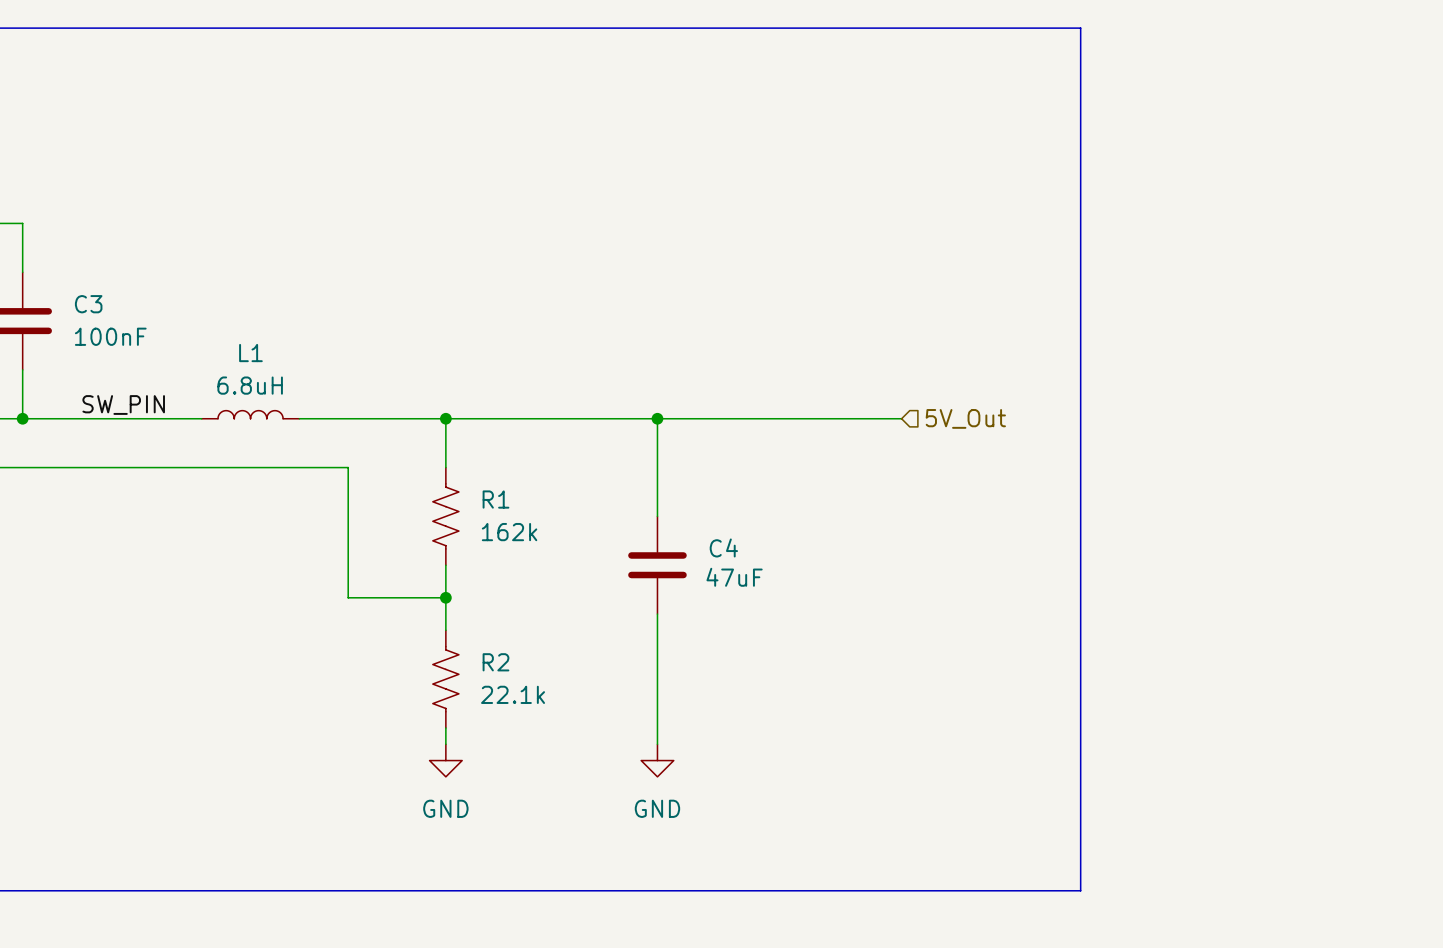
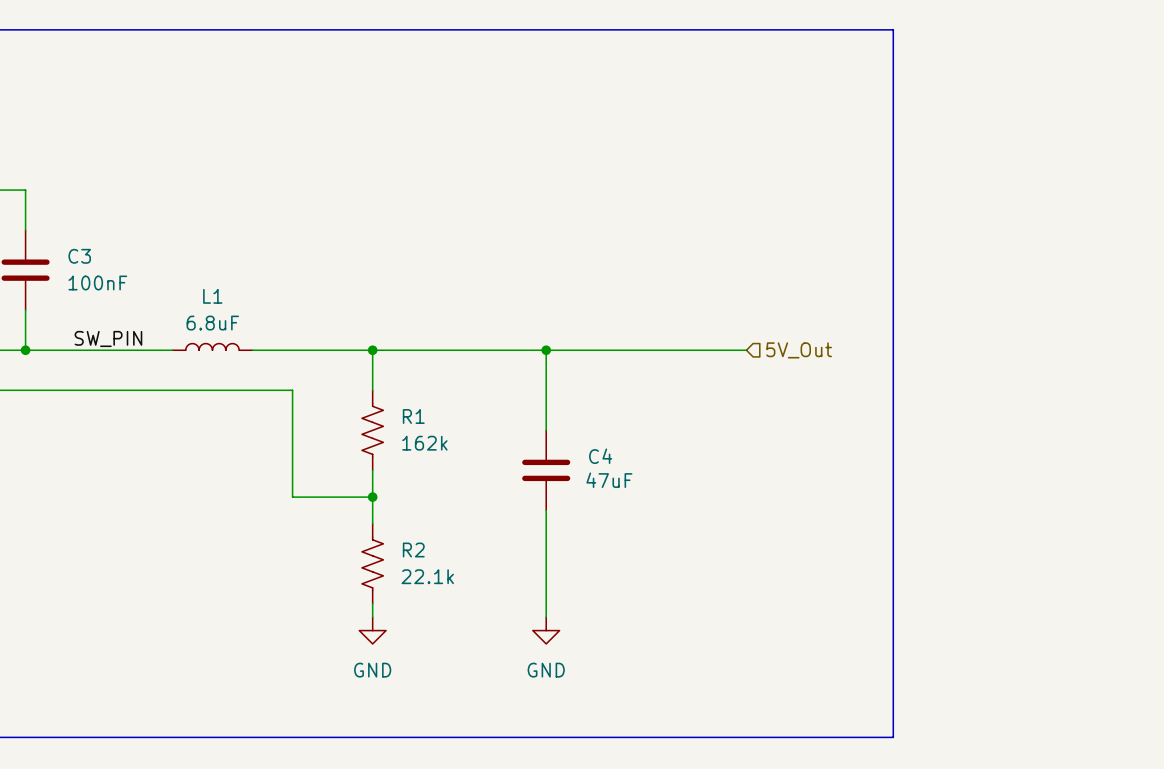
L1 value: 6.8uH (250, 385) -> 6.8uF (212, 323)

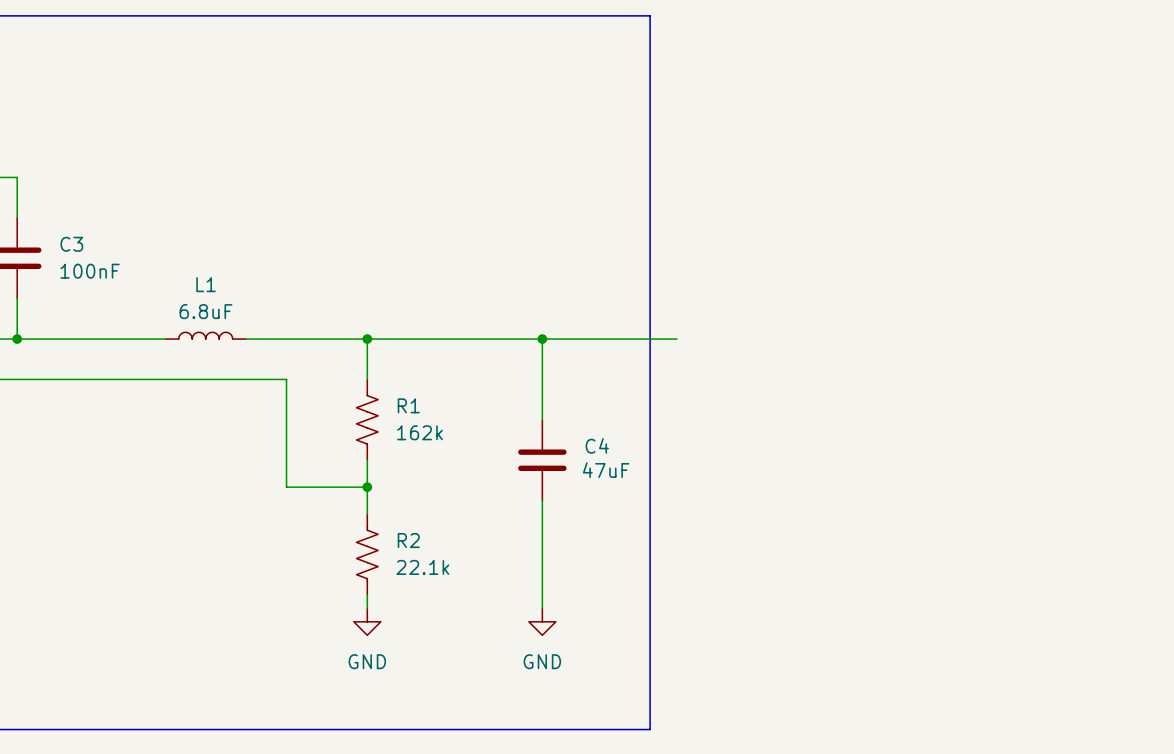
line: (653, 29) (893, 29) (893, 737) (653, 737) -> (650, 15) (650, 729)
label: SW_PIN (108, 338) -> none
wire: (679, 350) (746, 350) -> none
hierarchical label: 5V_Out (799, 350) -> none

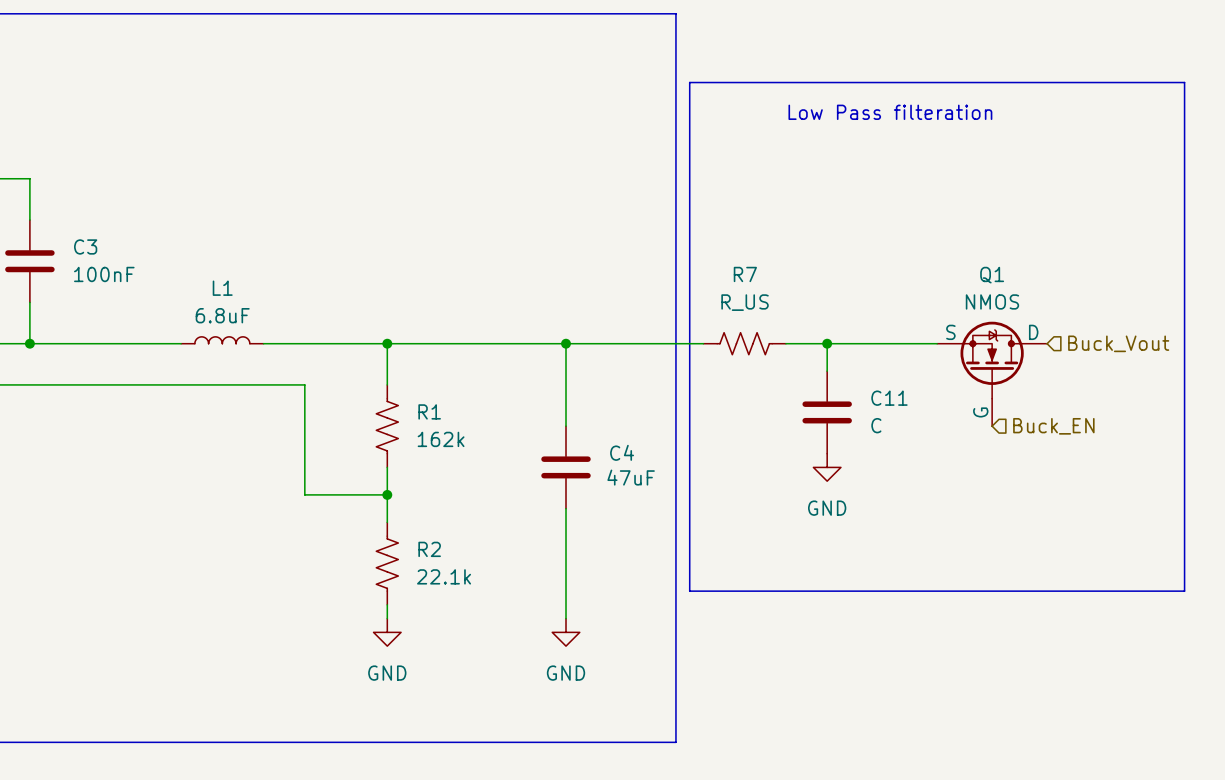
line: none -> (689, 82) (1184, 82) (1184, 591) (689, 591) (689, 82)
text: none -> Low Pass filteration (890, 112)
R7: none -> R_US (744, 343)
wire: none -> (785, 343) (937, 343)
wire: none -> (827, 343) (827, 371)
junction: none -> (827, 343)
hierarchical label: none -> Buck_Vout (1118, 343)
Q1: none -> NMOS (992, 373)
C11: none -> C (827, 412)
hierarchical label: none -> Buck_EN (1053, 426)
power symbol: none -> GND (827, 467)

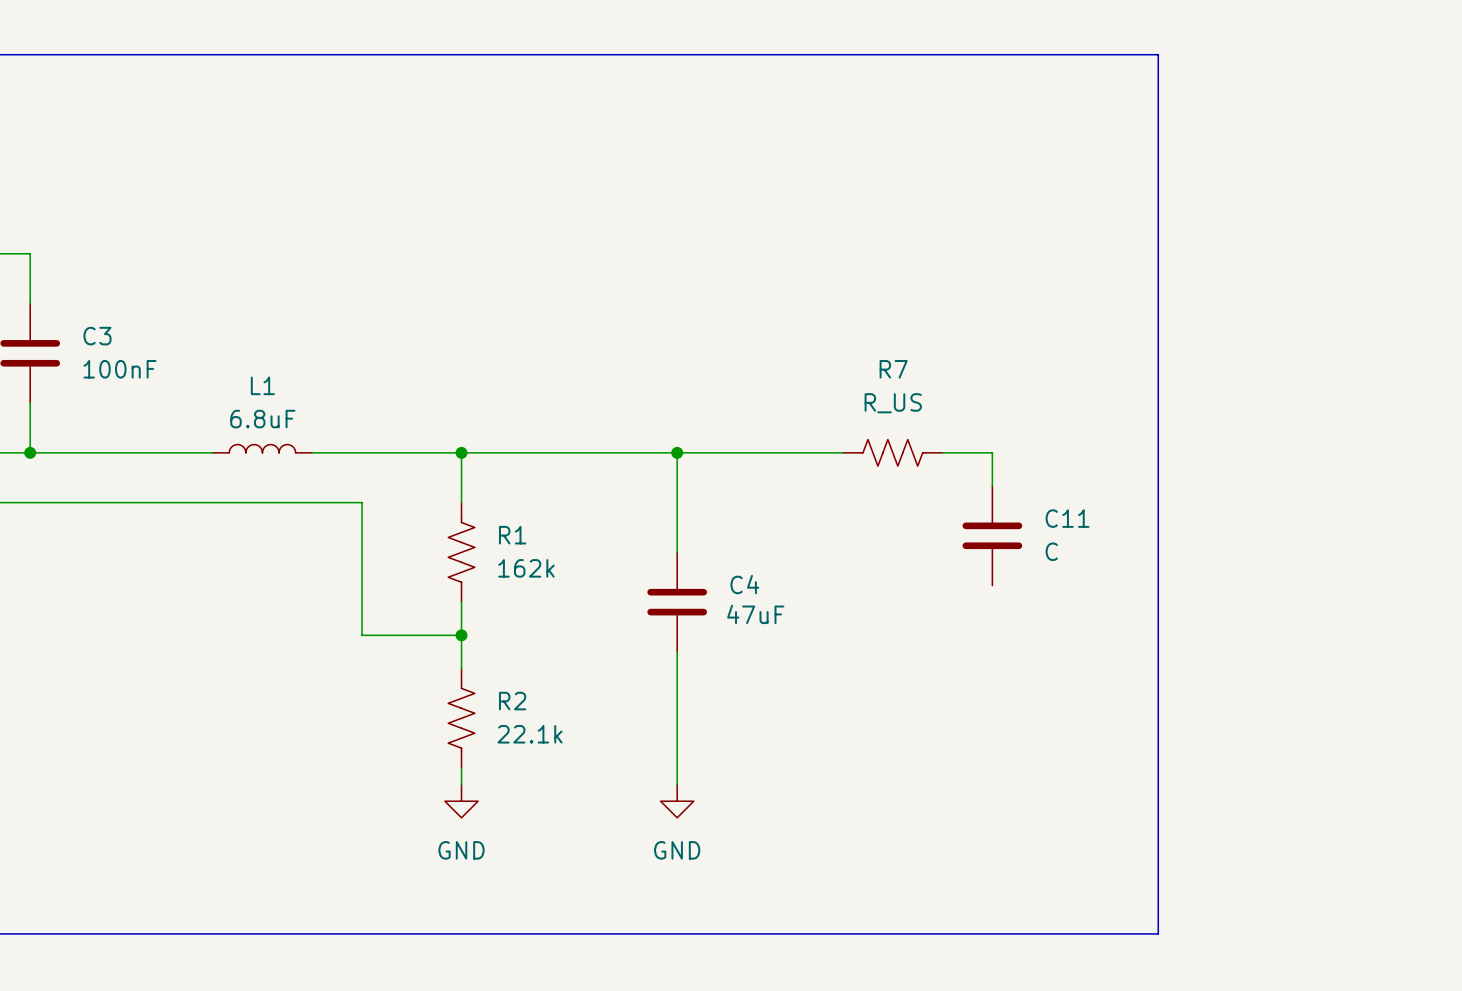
line: (675, 13) (675, 742) -> (809, 54) (1158, 54) (1158, 933) (809, 933)
line: (689, 82) (1184, 82) (1184, 591) (689, 591) (689, 82) -> none
text: Low Pass filteration (890, 112) -> none
wire: (827, 343) (937, 343) -> none
junction: (827, 343) -> none
hierarchical label: Buck_Vout (1118, 343) -> none
Q1: NMOS (992, 373) -> none
hierarchical label: Buck_EN (1053, 426) -> none
power symbol: GND (827, 467) -> none

